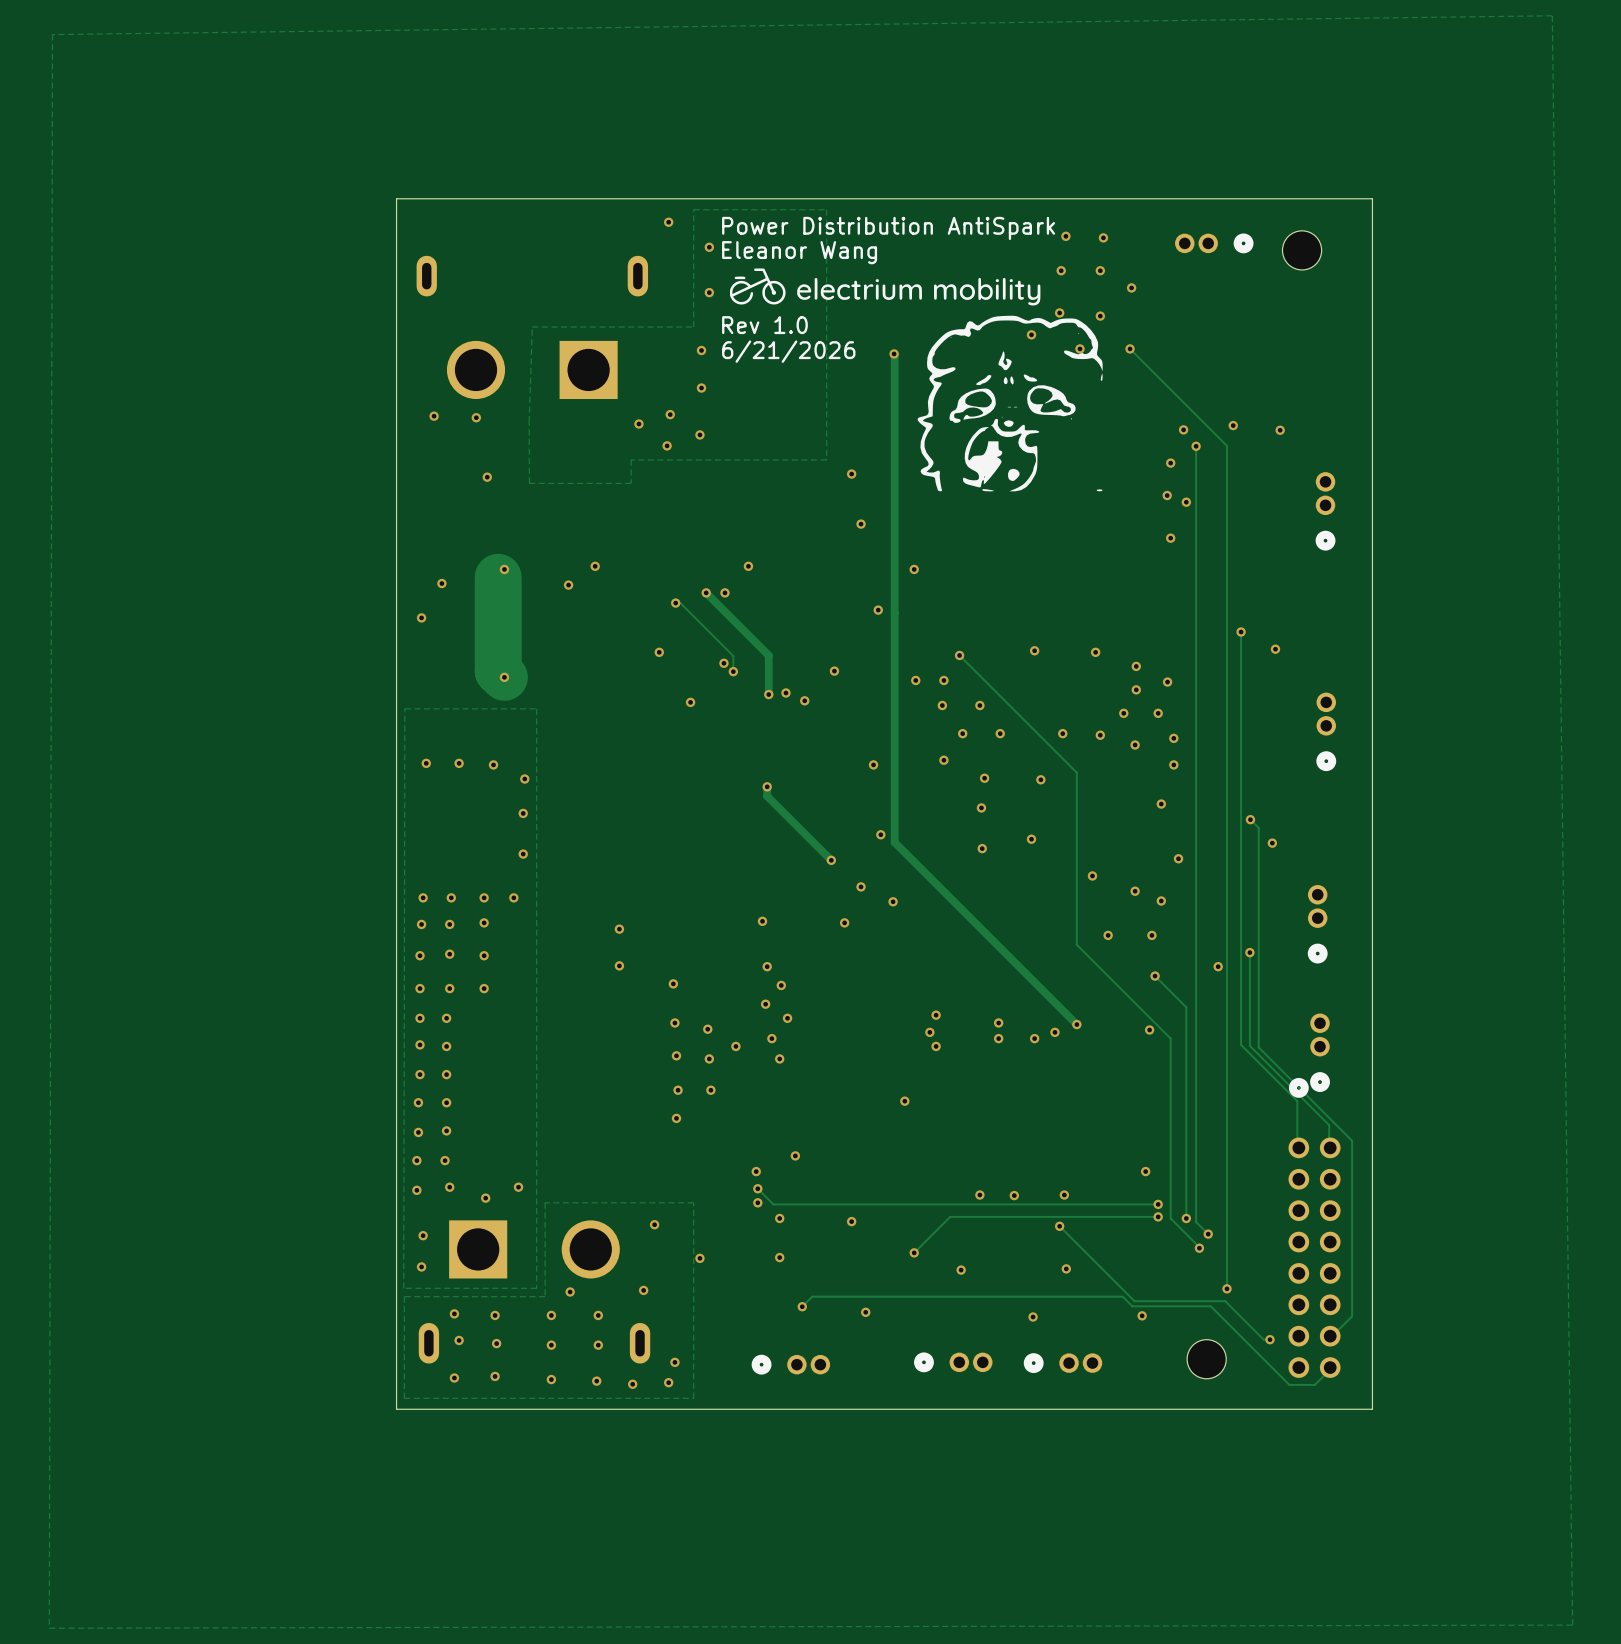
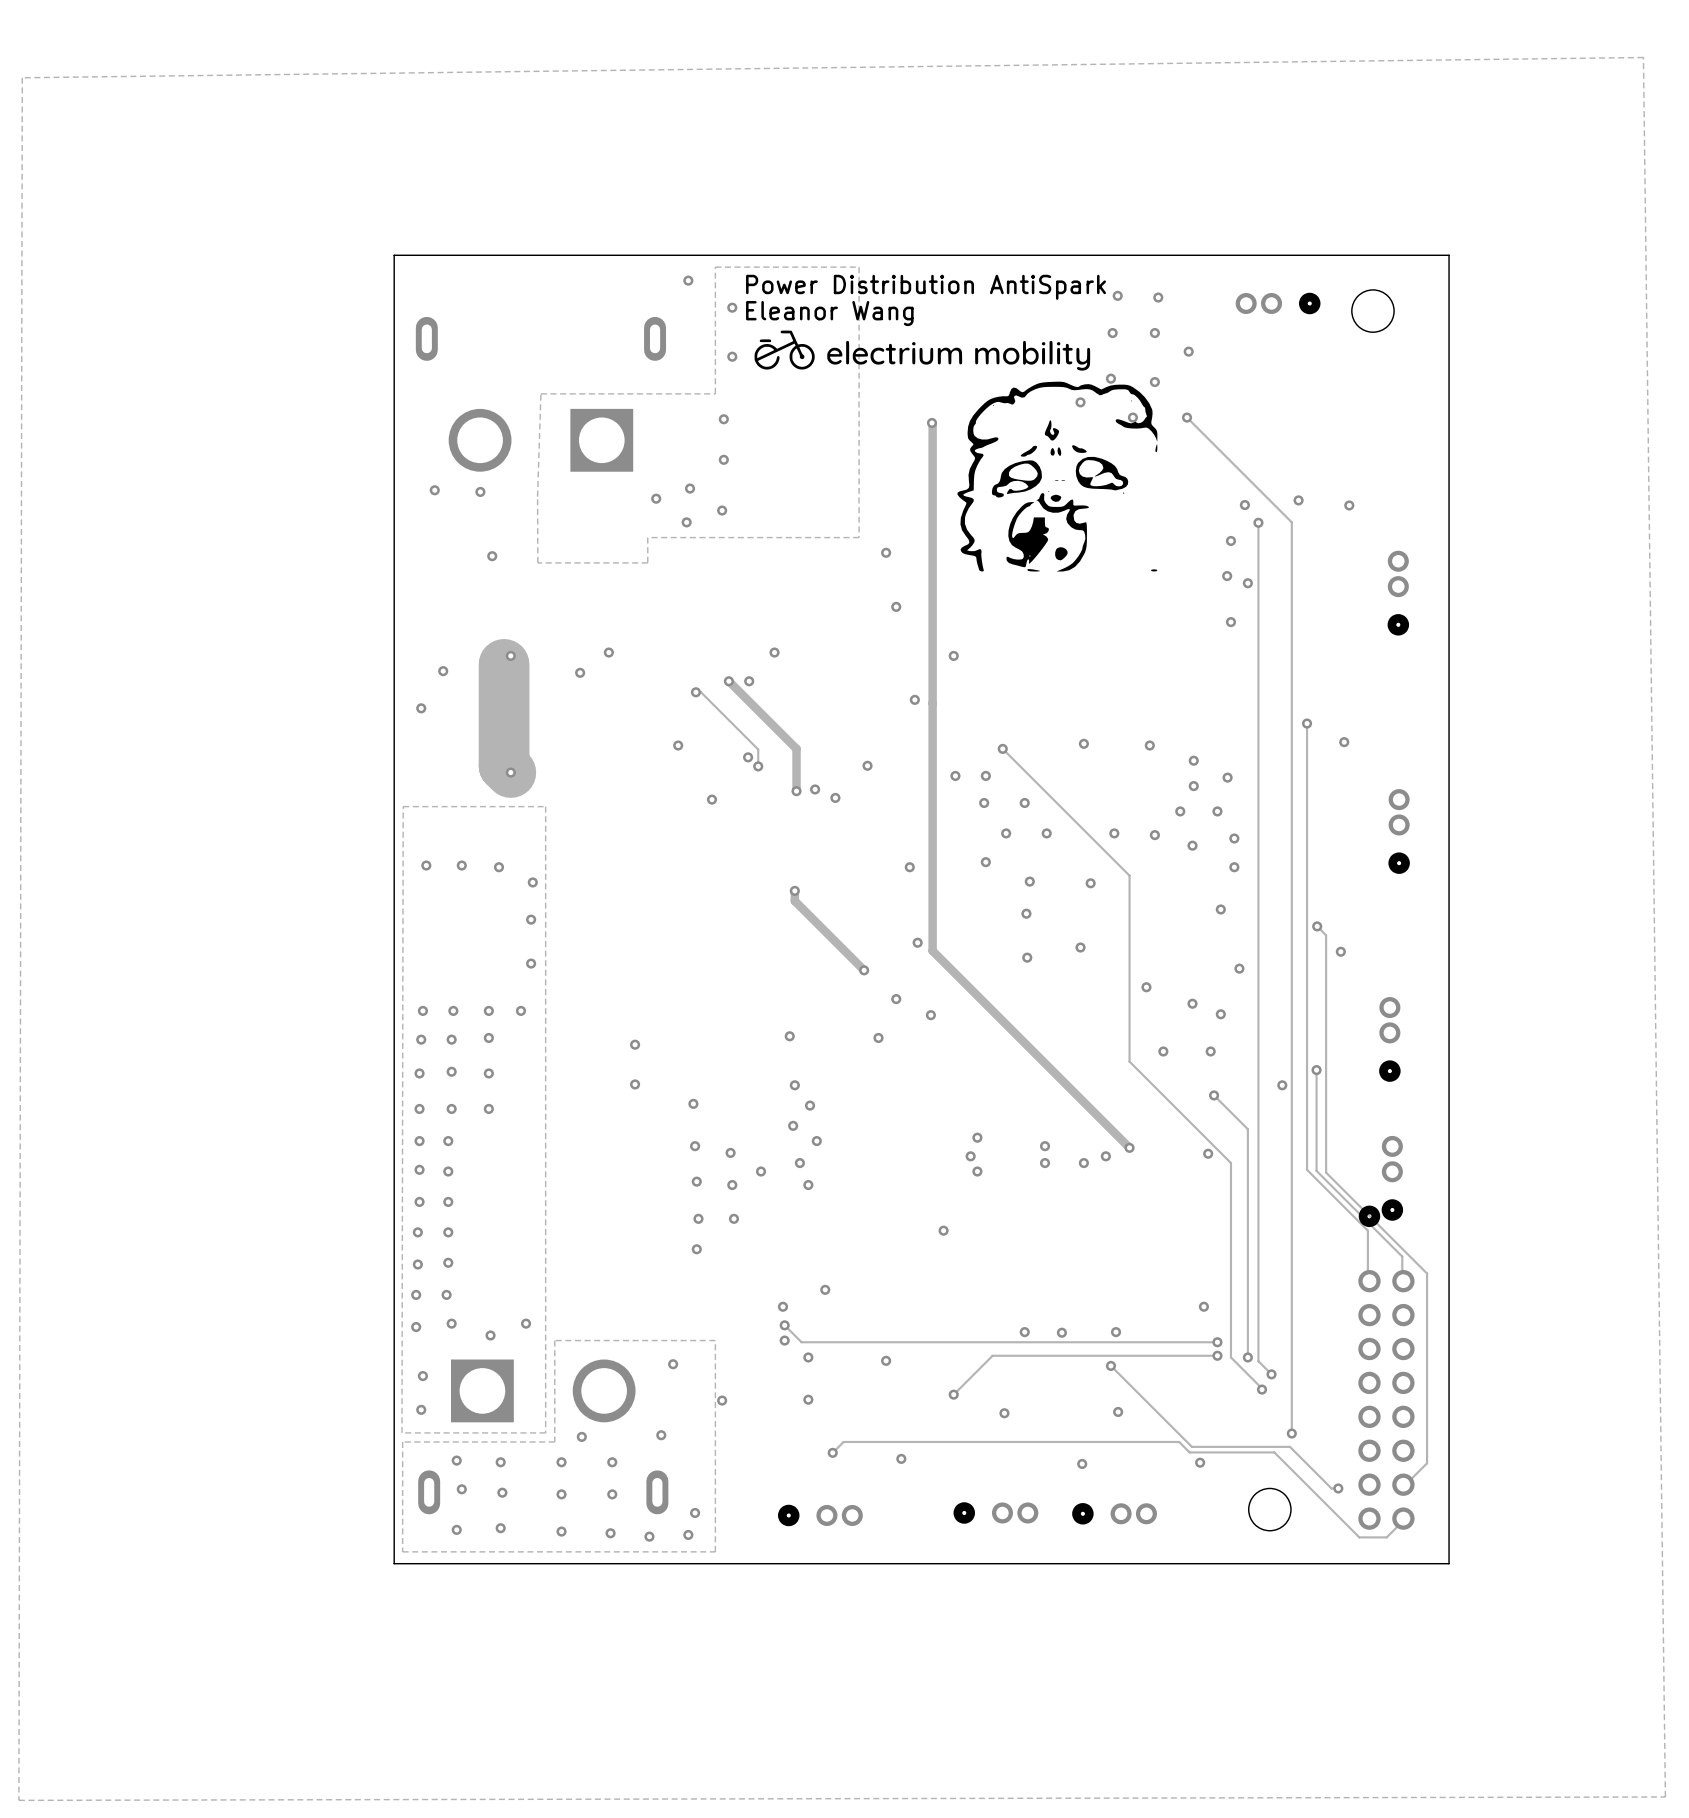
text: Rev 1.0 (764, 325) -> none
text: 6/21/2026 (788, 351) -> none

